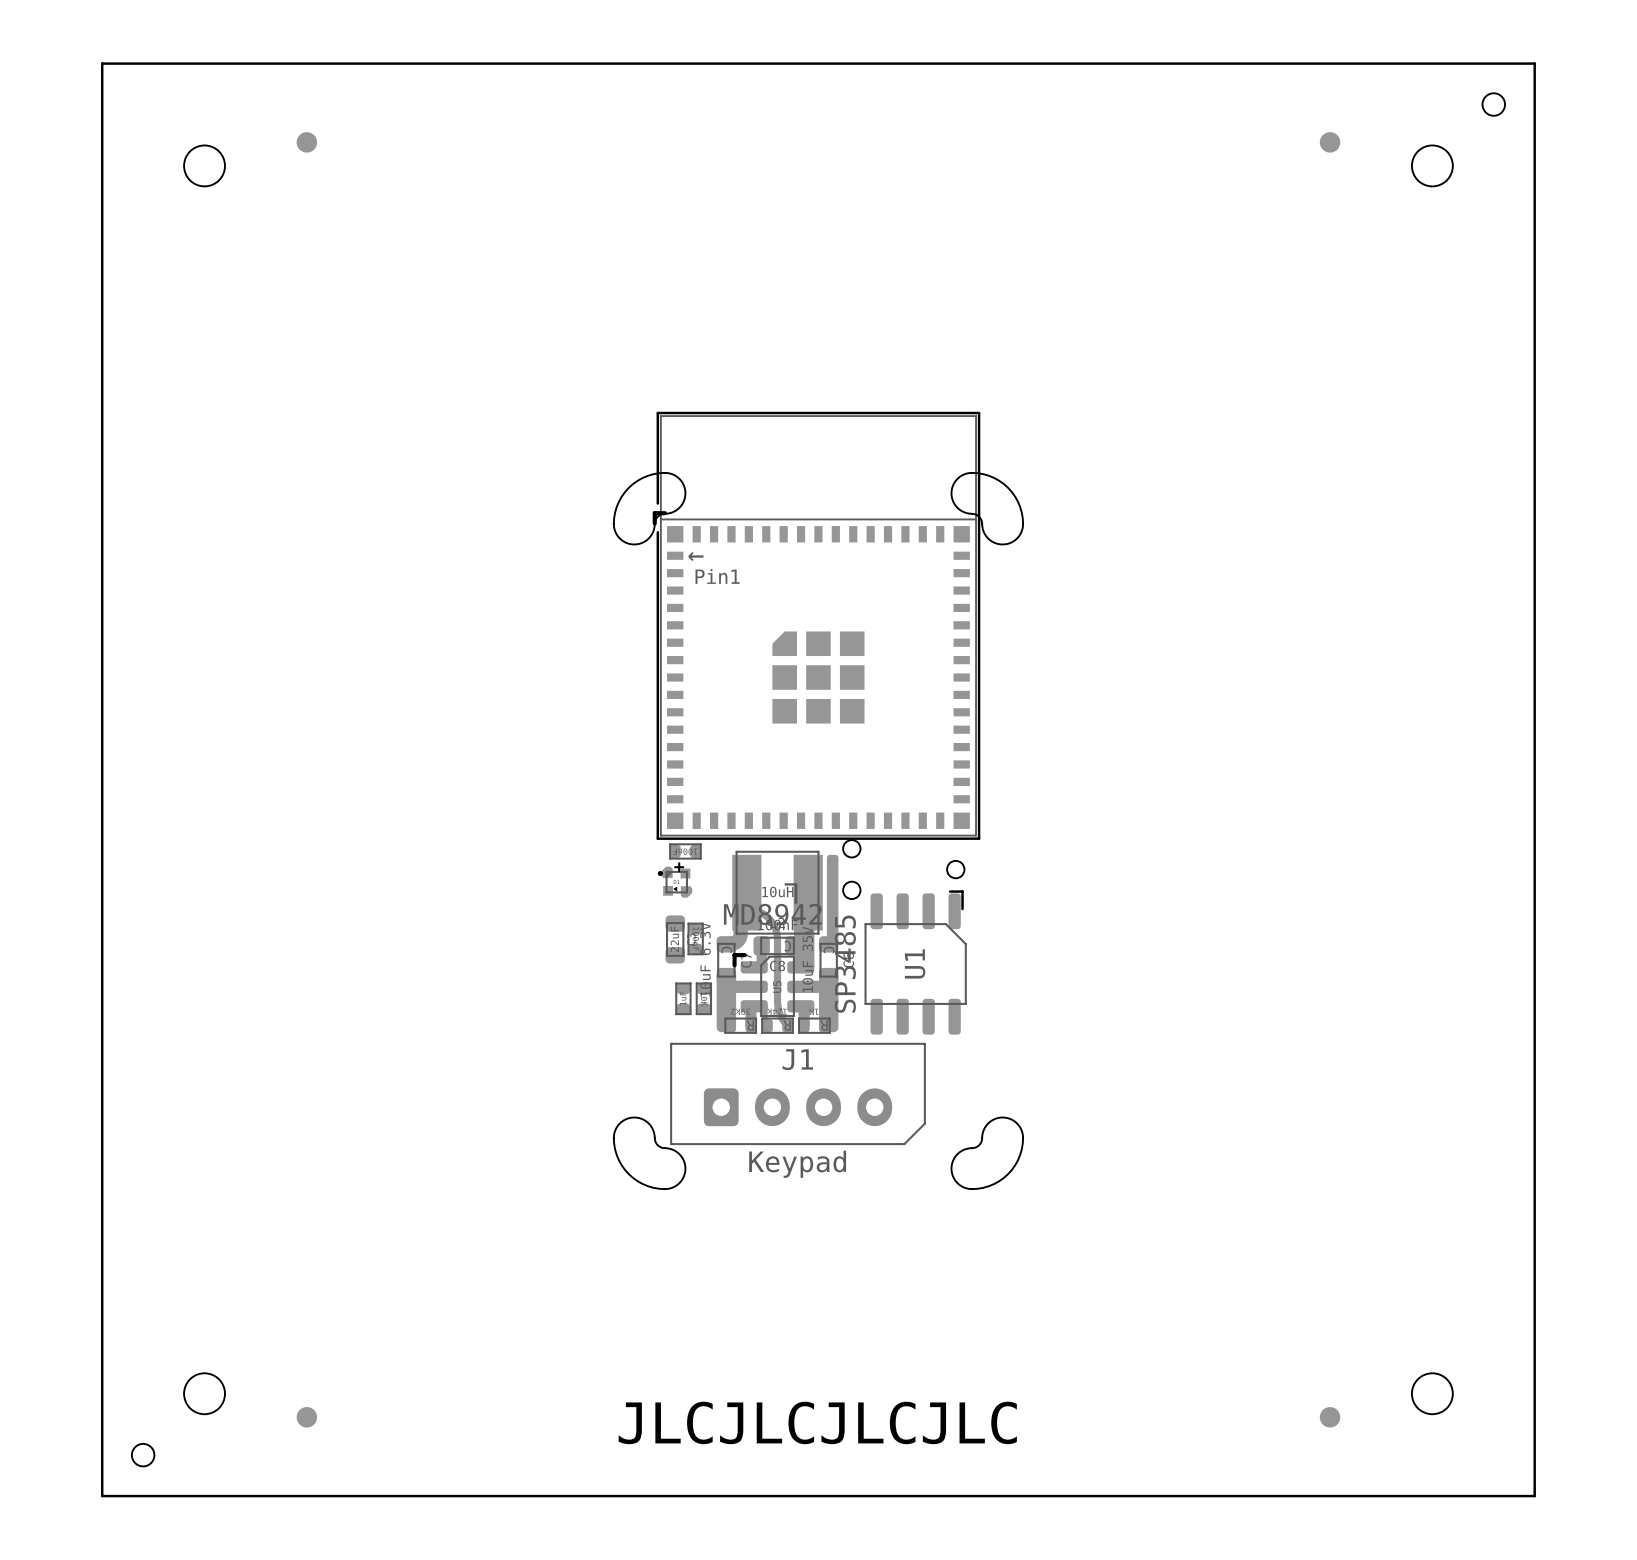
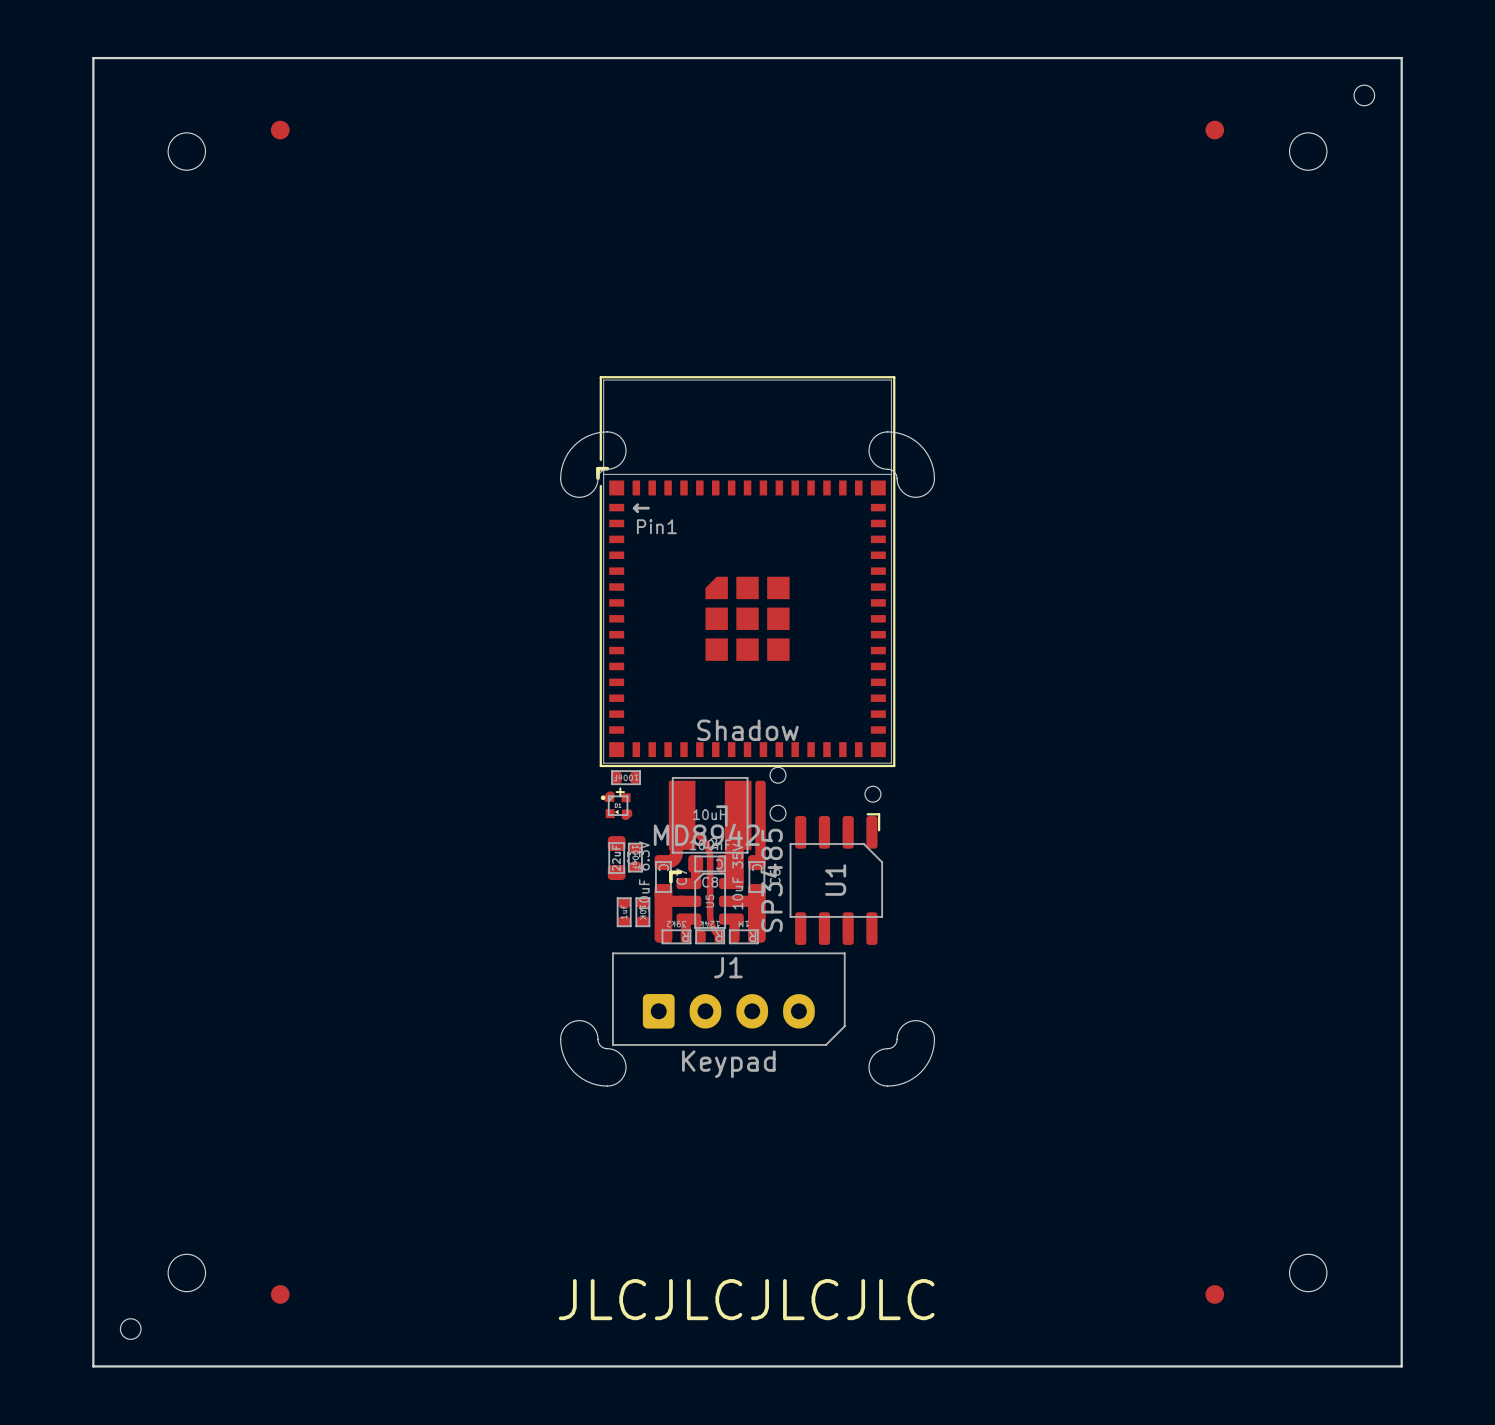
drawing: none -> [697, 719, 799, 741]

